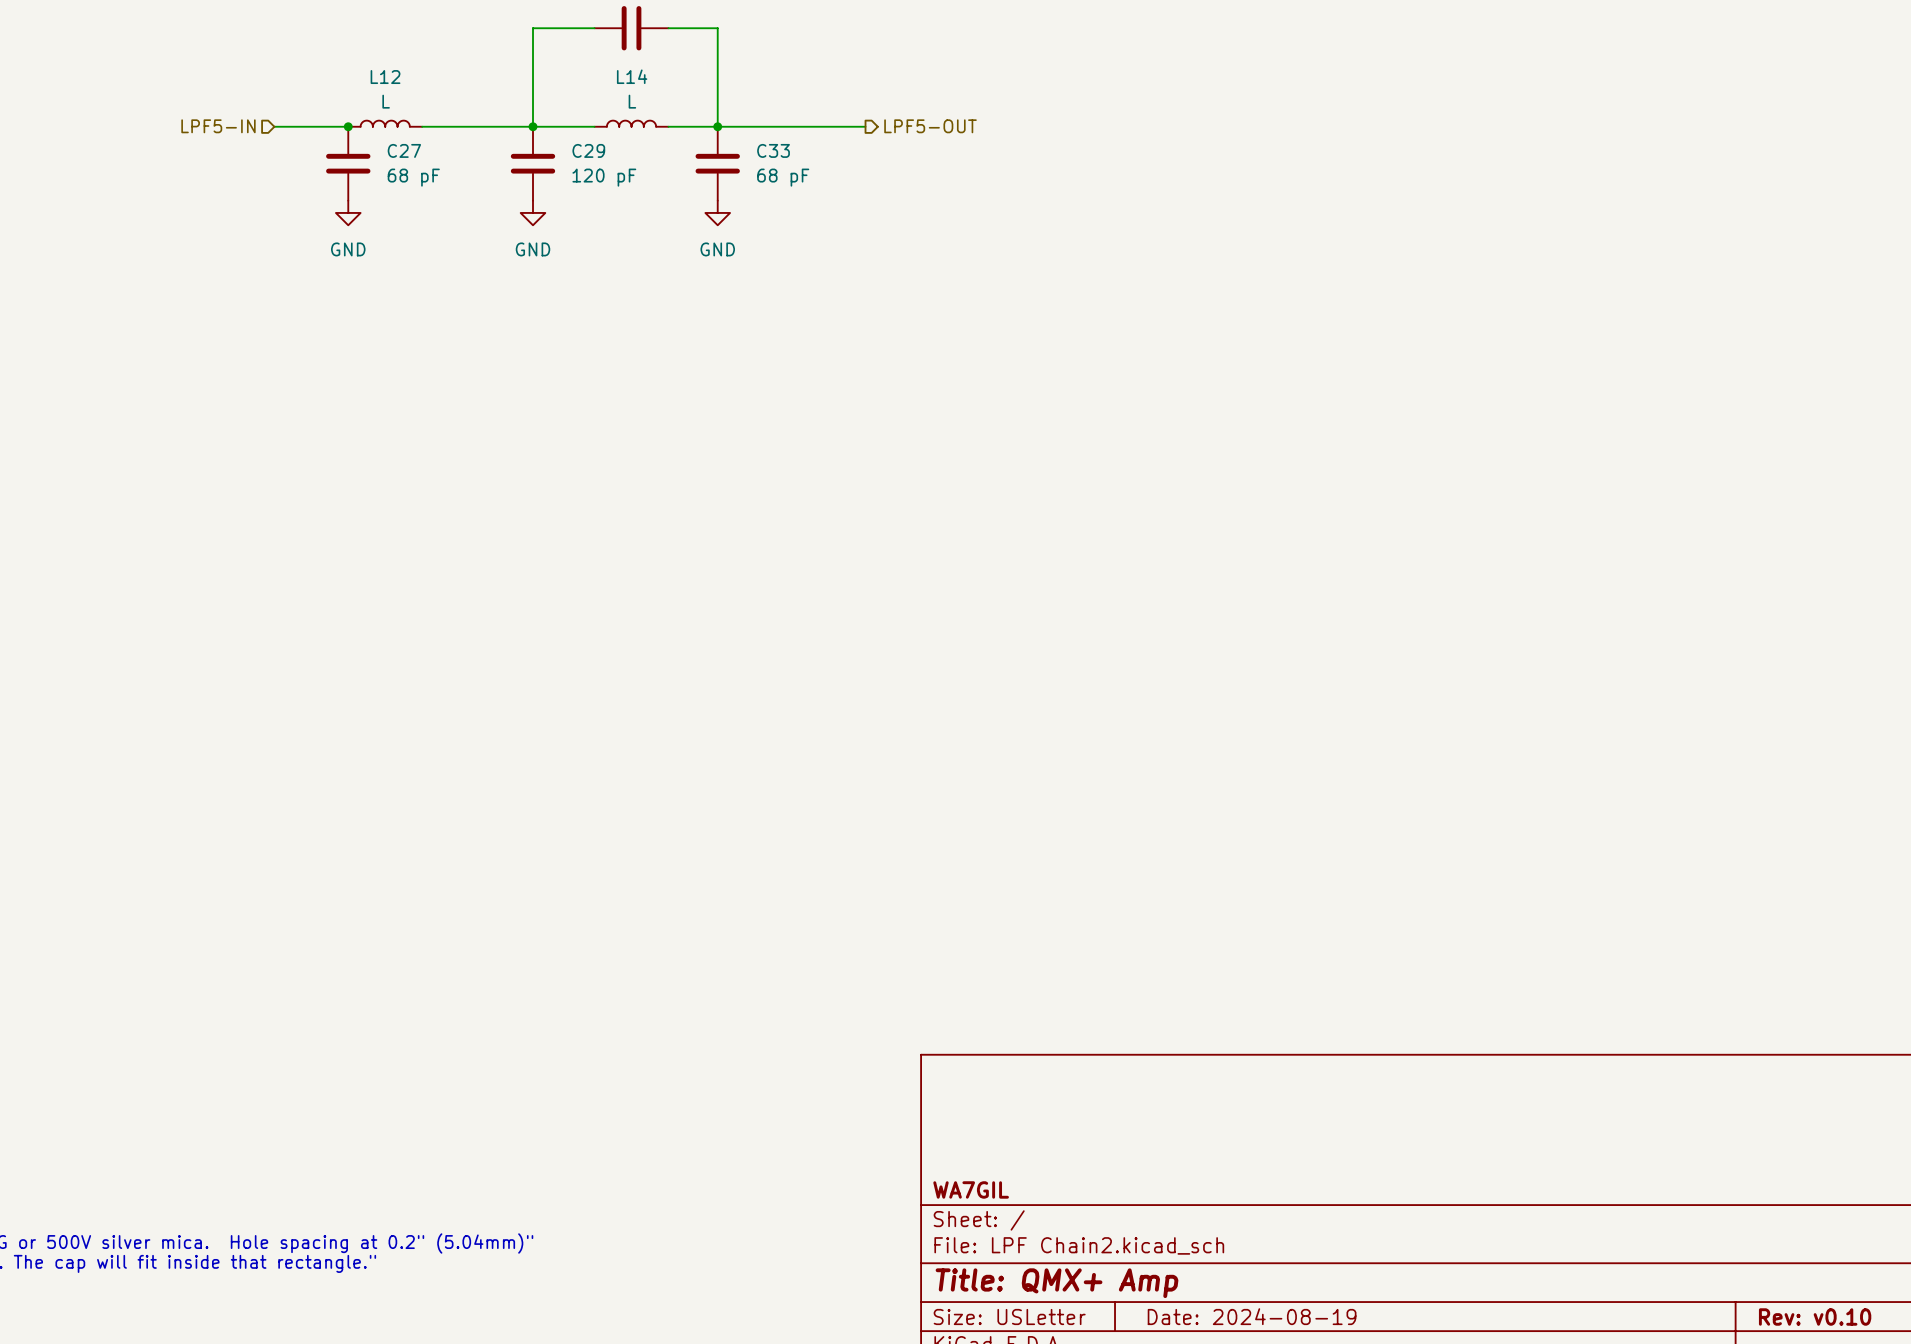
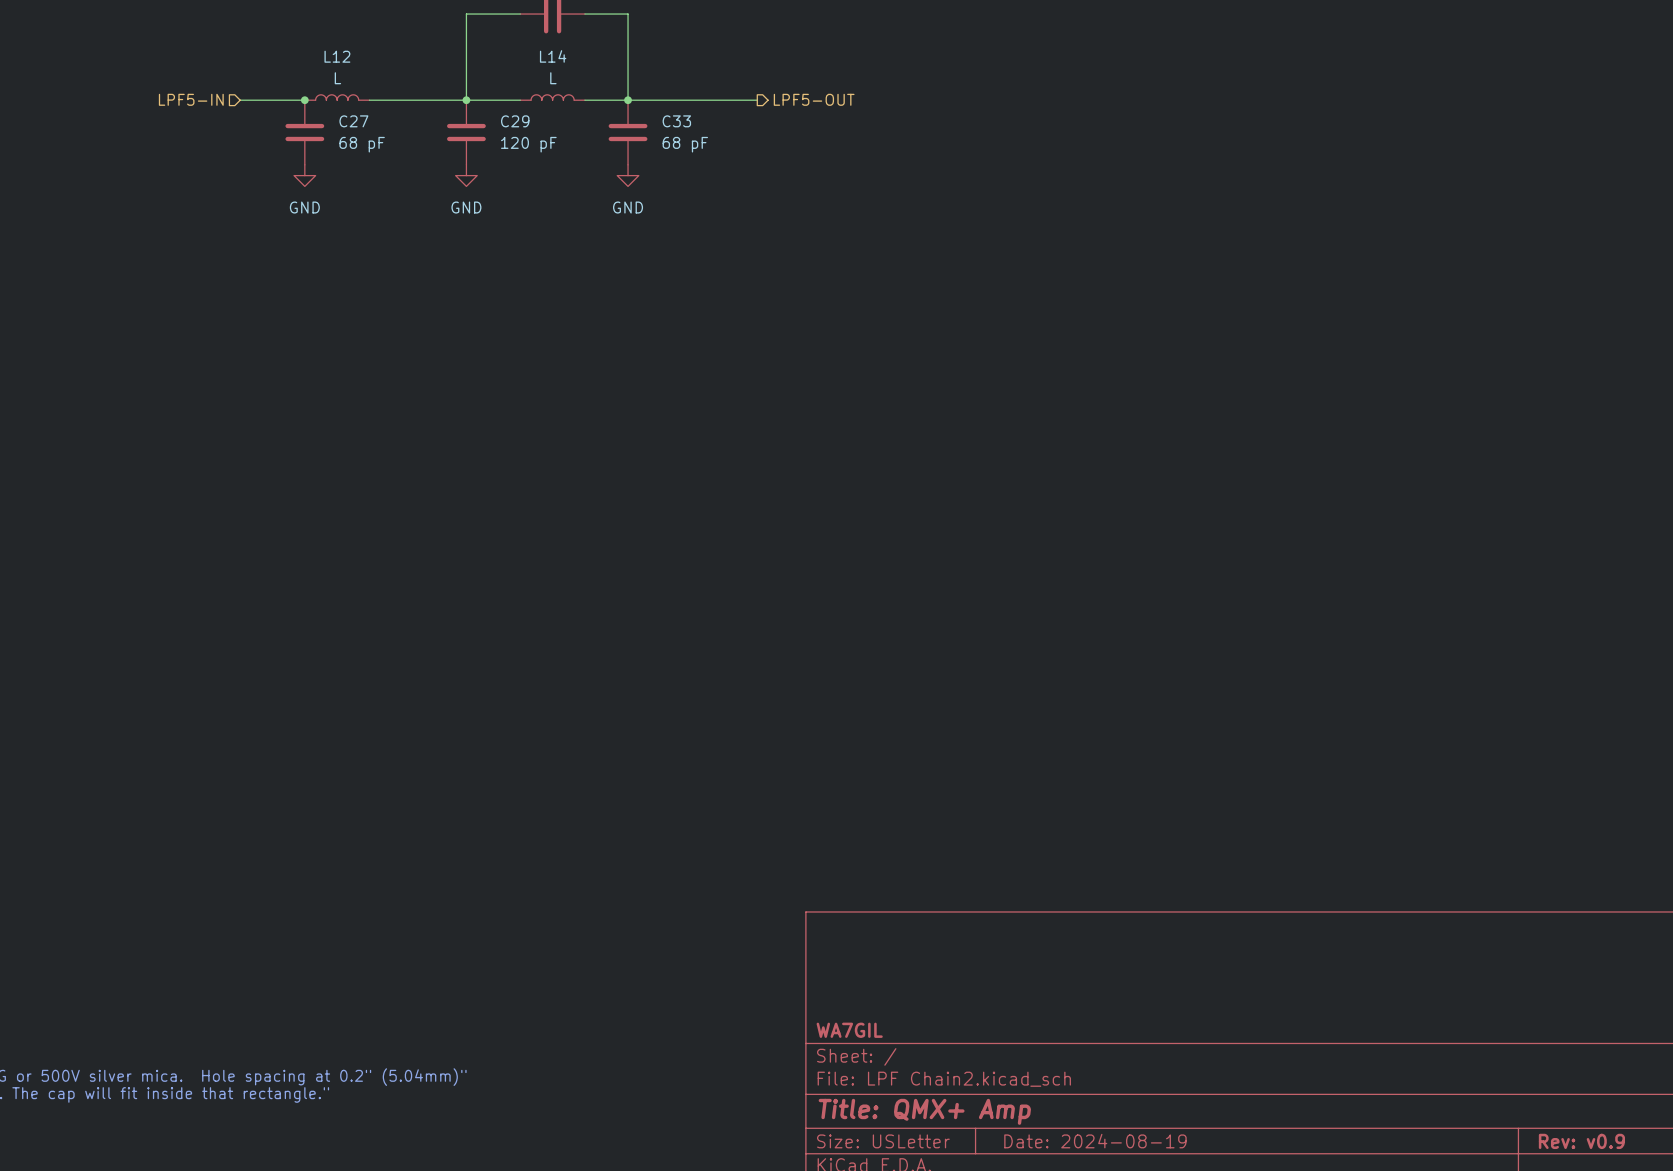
title block: Rev: v0.10 (1815, 1317) -> Rev: v0.9 (1581, 1141)

